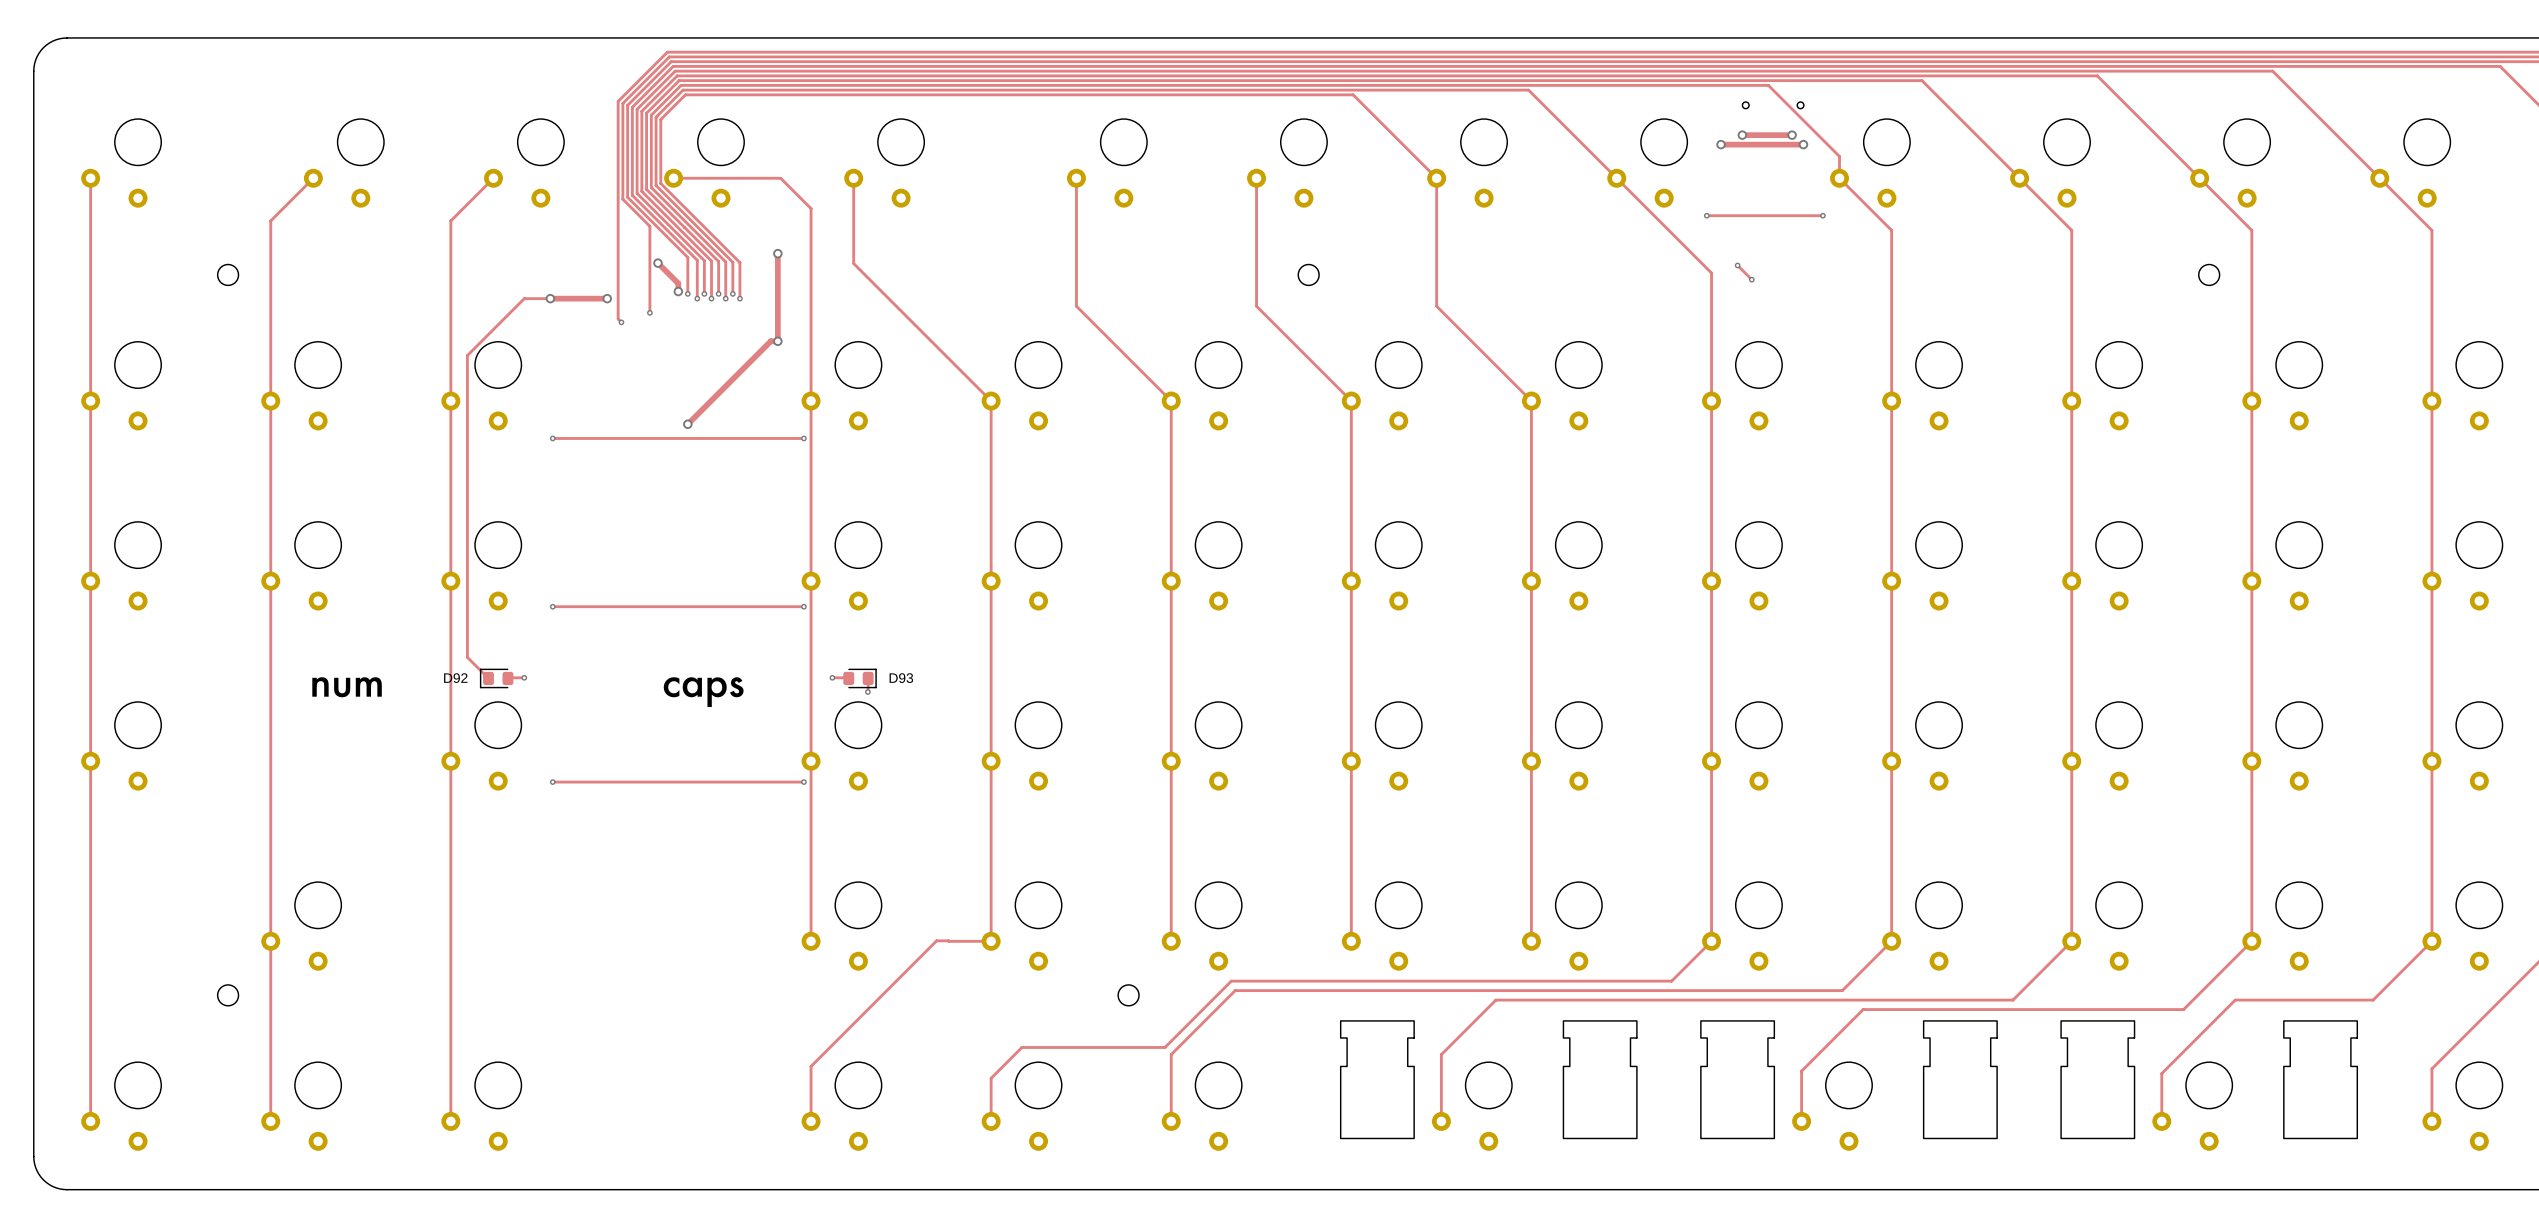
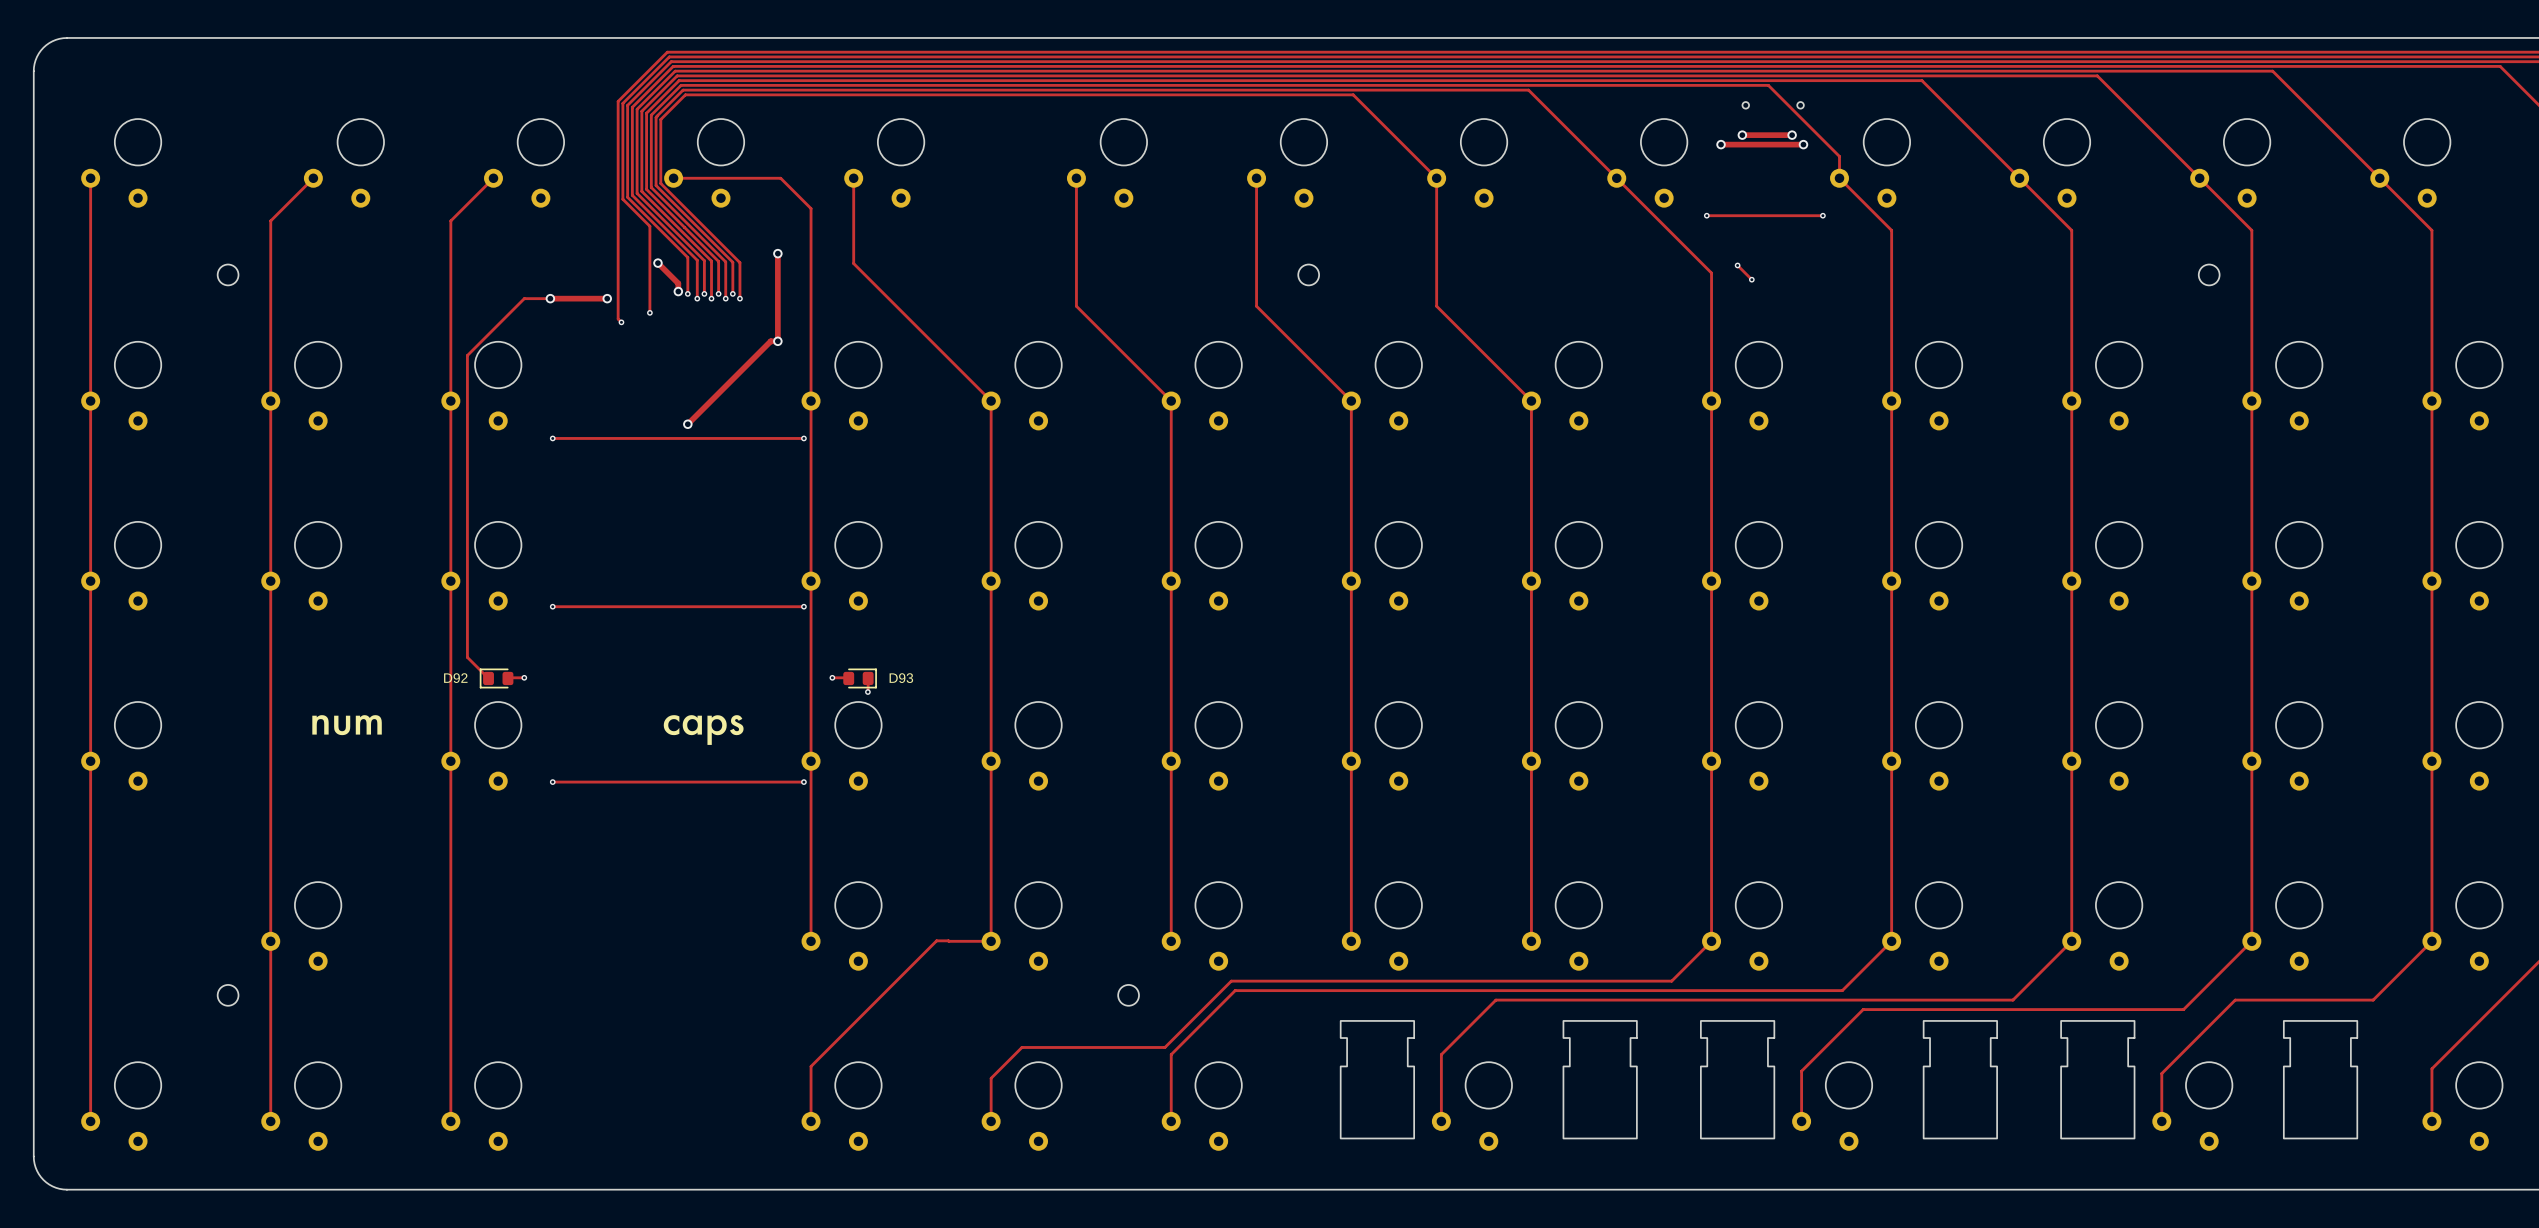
drawing position: (320, 686) -> (320, 724)
drawing position: (368, 686) -> (368, 724)
drawing position: (342, 687) -> (342, 725)
drawing position: (671, 687) -> (671, 725)
drawing position: (692, 687) -> (692, 725)
drawing position: (736, 687) -> (736, 725)
drawing position: (717, 692) -> (717, 730)

